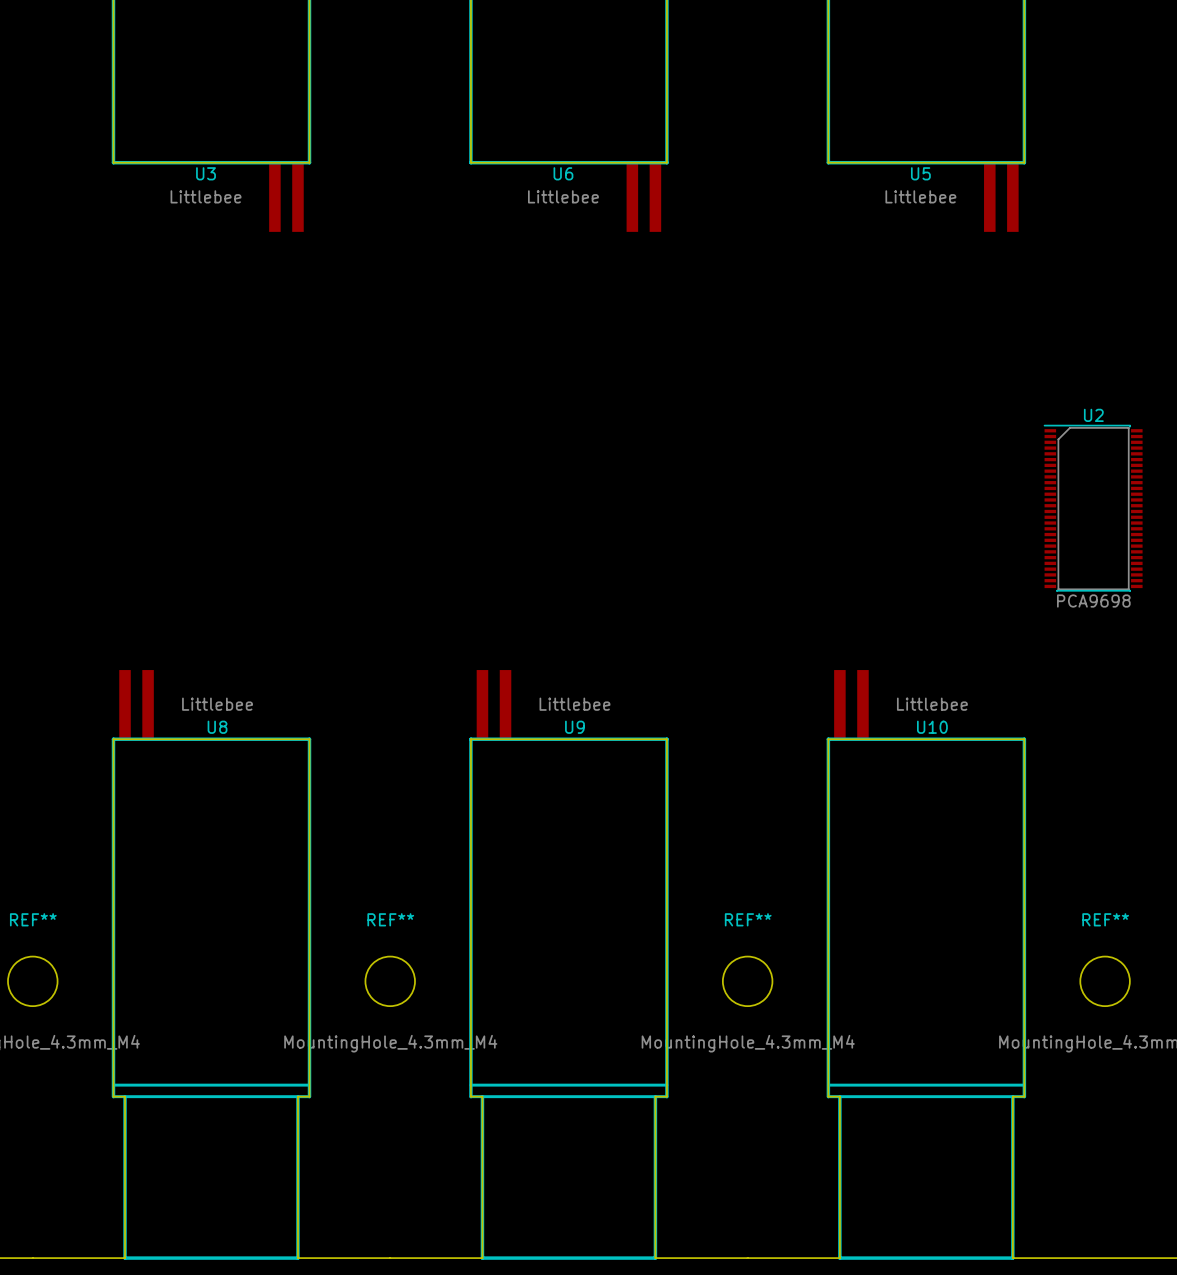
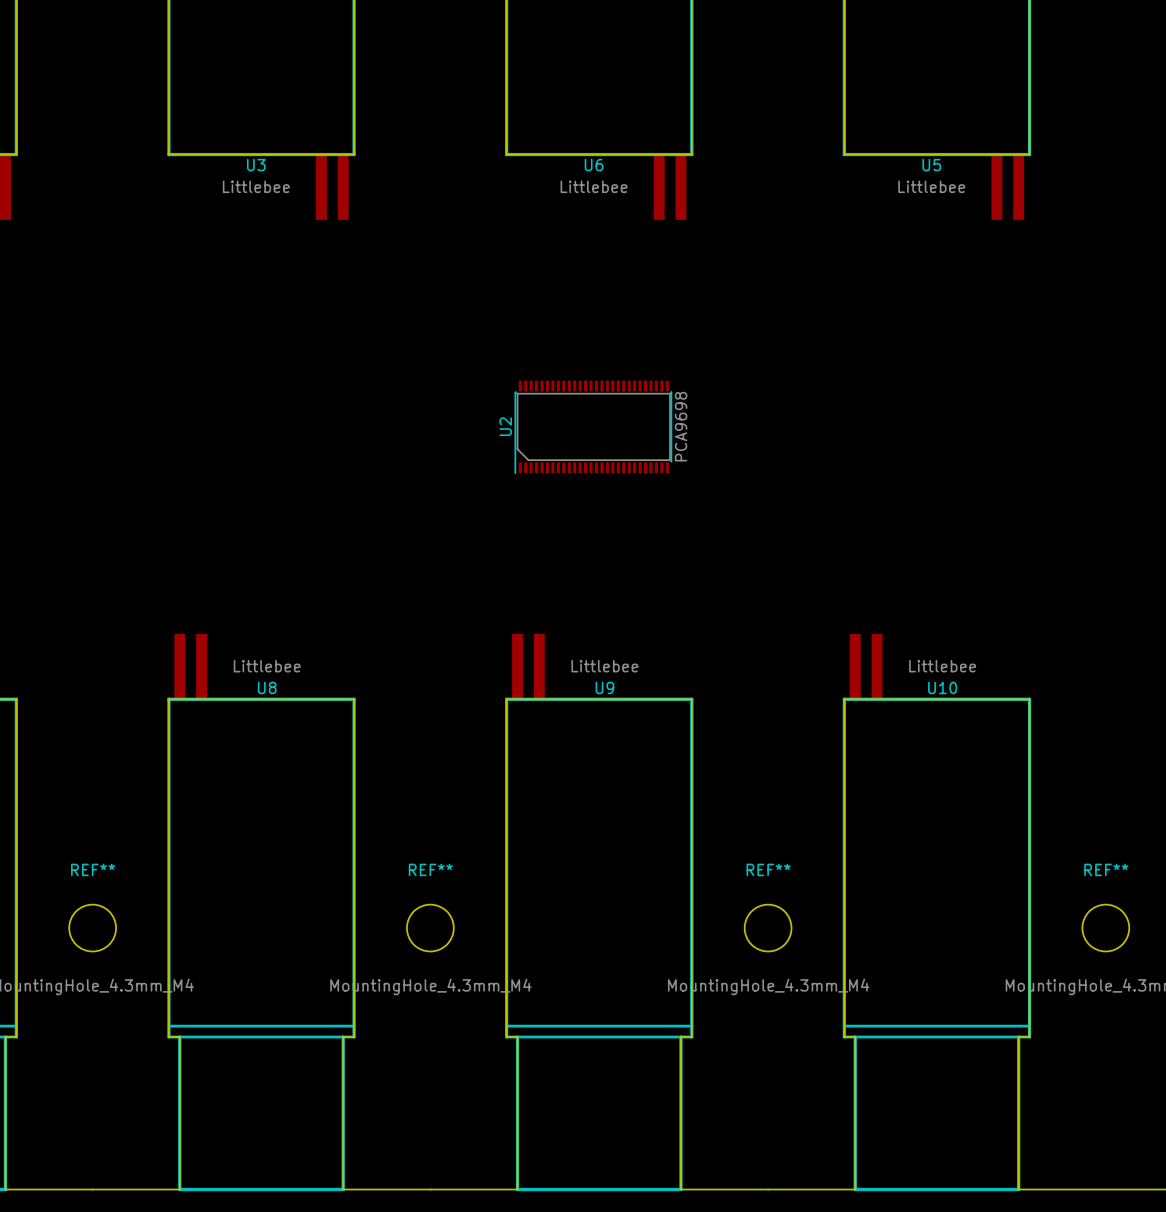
U2 rotation: 0° (1093, 508) -> 90° counterclockwise (593, 427)
U2 position: (1093, 508) -> (593, 427)

